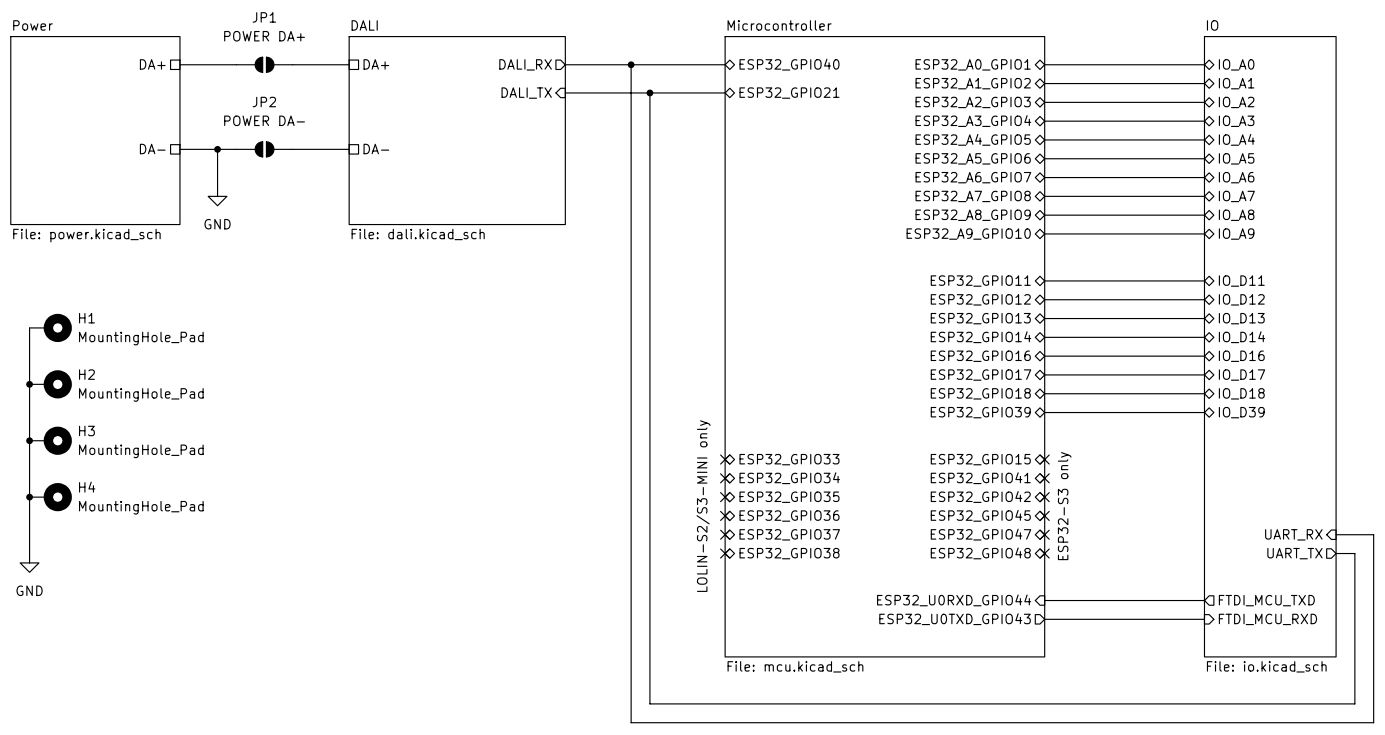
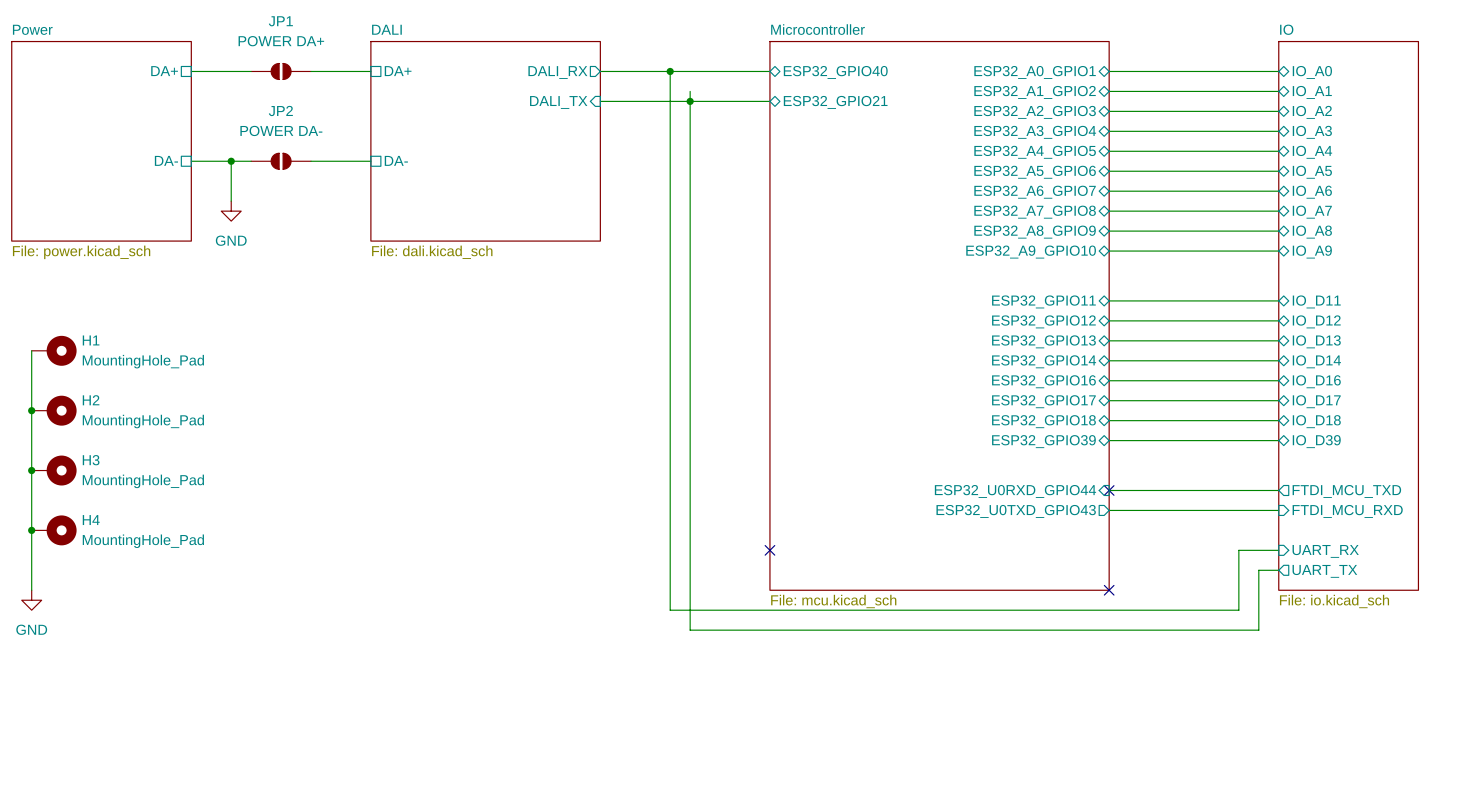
wire: none -> (690, 91) (690, 101)
sheet Microcontroller: none -> File: mcu.kicad_sch (939, 315)
sheet IO: none -> File: io.kicad_sch (1348, 315)
sheet Microcontroller: File: mcu.kicad_sch (884, 346) -> none
sheet IO: File: io.kicad_sch (1270, 346) -> none
no-connect mark: (725, 459) -> none
sheet pin: ESP32_GPIO33 (789, 459) -> none
sheet pin shape: bidirectional (980, 459) -> input (1015, 491)
sheet pin: ESP32_GPIO15 (980, 459) -> ESP32_U0RXD_GPIO44 (1015, 491)
no-connect mark: (725, 478) -> none
sheet pin: ESP32_GPIO34 (789, 478) -> none
sheet pin shape: bidirectional (980, 478) -> output (1016, 511)
sheet pin: ESP32_GPIO41 (980, 478) -> ESP32_U0TXD_GPIO43 (1016, 511)
no-connect mark: (1044, 478) -> none
no-connect mark: (725, 497) -> none
sheet pin: ESP32_GPIO35 (789, 497) -> none
sheet pin: ESP32_GPIO42 (980, 497) -> none
no-connect mark: (1044, 497) -> none
text: LOLIN-S2/S3-MINI only (703, 506) -> none
text: ESP32-S3 only (1064, 506) -> none
sheet pin: ESP32_GPIO45 (980, 515) -> none
no-connect mark: (1044, 515) -> none
sheet pin: ESP32_GPIO36 (789, 516) -> none
no-connect mark: (725, 534) -> none
sheet pin: ESP32_GPIO37 (789, 534) -> none
sheet pin: ESP32_GPIO47 (980, 534) -> none
no-connect mark: (1044, 534) -> none
sheet pin rotation: 0° (1293, 534) -> 180° (1325, 551)
wire: (1336, 534) (1373, 534) (1373, 722) (631, 722) (631, 572) -> (1278, 550) (1238, 550) (1238, 610) (670, 610)
no-connect mark: (725, 553) -> none
sheet pin: ESP32_GPIO38 (789, 553) -> none
sheet pin: ESP32_GPIO48 (980, 553) -> none
sheet pin rotation: 0° (1294, 553) -> 180° (1324, 571)
wire: (1336, 553) (1354, 553) (1354, 703) (649, 703) (649, 591) -> (1278, 570) (1258, 570) (1258, 630) (690, 630)
sheet pin: ESP32_U0RXD_GPIO44 (954, 600) -> none
wire: (1044, 600) (1204, 600) -> (1109, 490) (1278, 490)
sheet pin position: FTDI_MCU_TXD (1266, 600) -> FTDI_MCU_TXD (1346, 491)
sheet pin: ESP32_U0TXD_GPIO43 (955, 619) -> none
wire: (1044, 619) (1204, 619) -> (1109, 510) (1278, 510)
sheet pin position: FTDI_MCU_RXD (1267, 619) -> FTDI_MCU_RXD (1347, 511)

